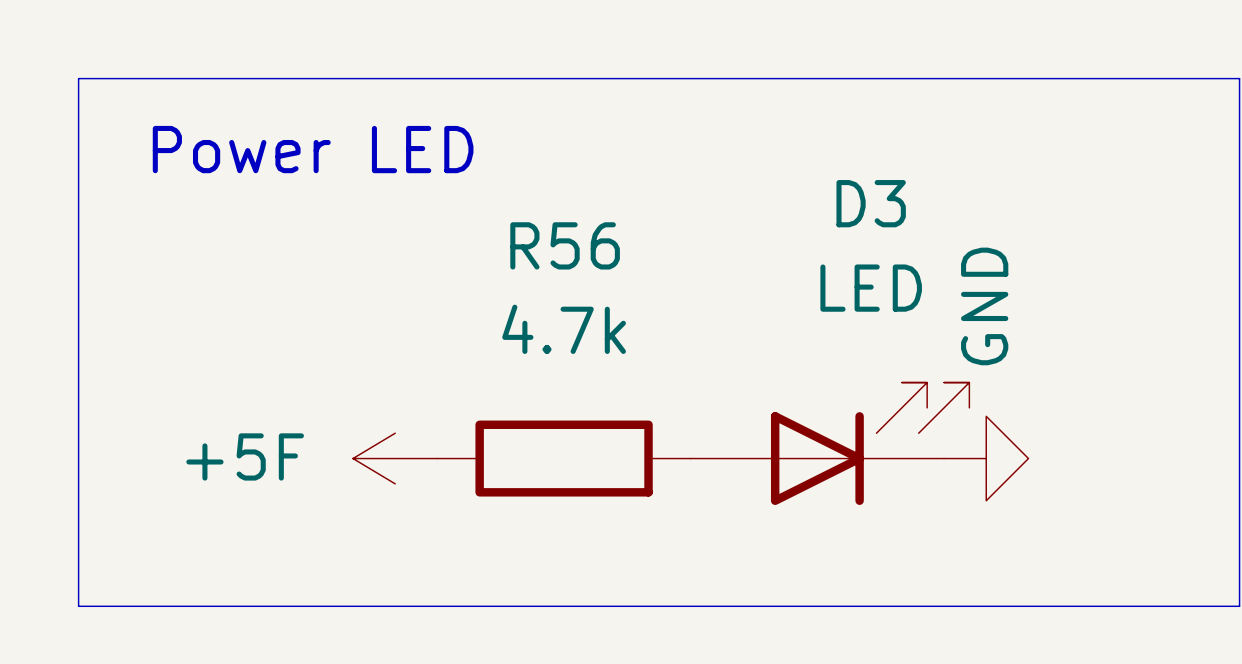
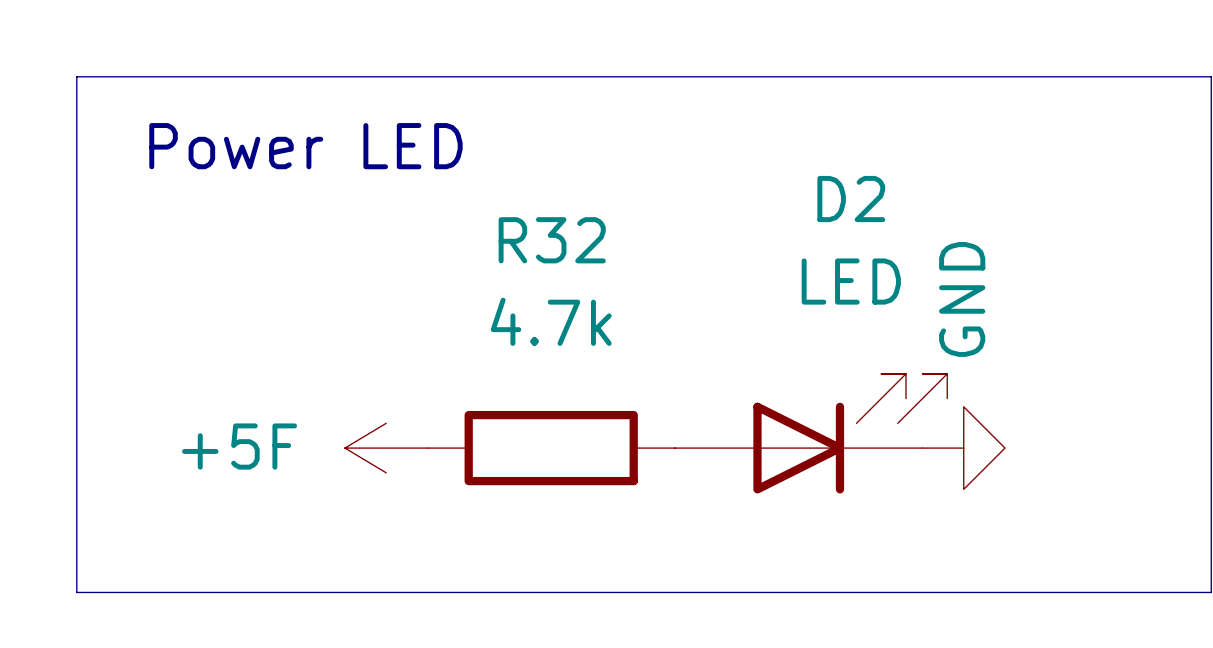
D3 name: D3 (871, 203) -> D2 (851, 199)
R56 name: R56 (565, 245) -> R32 (552, 240)

